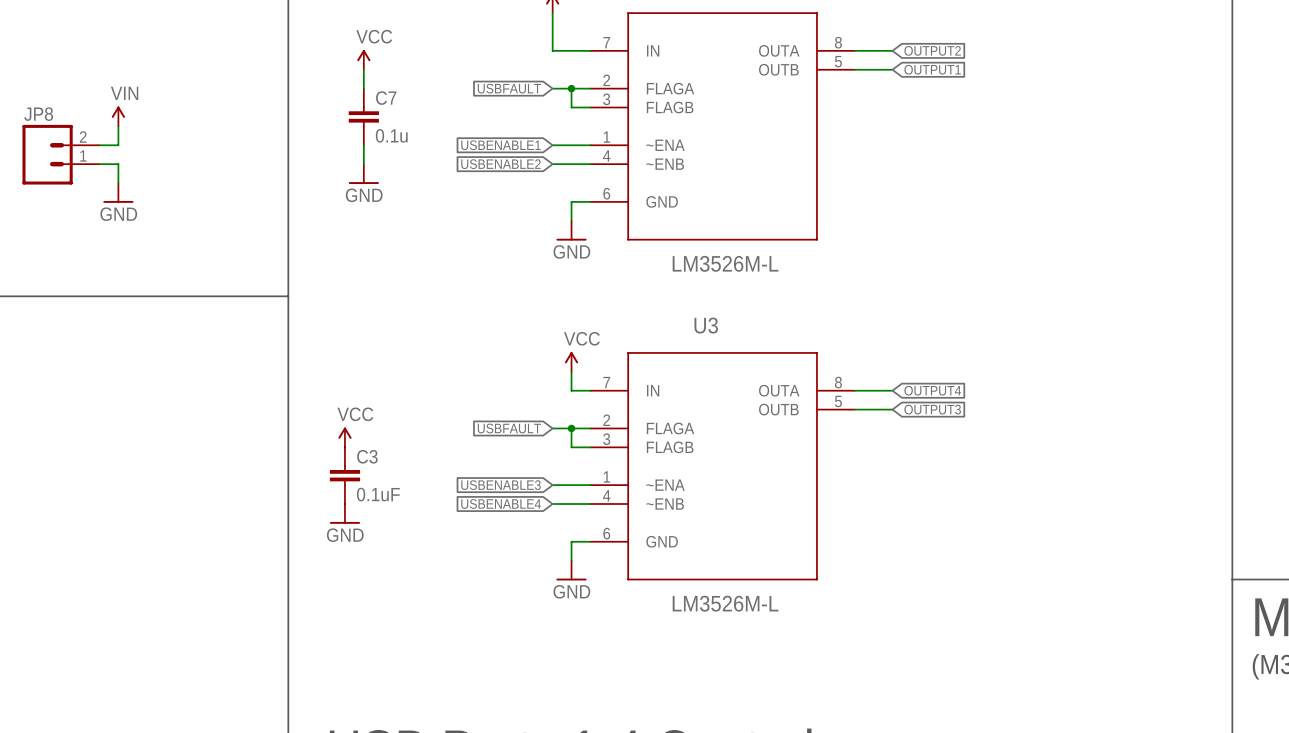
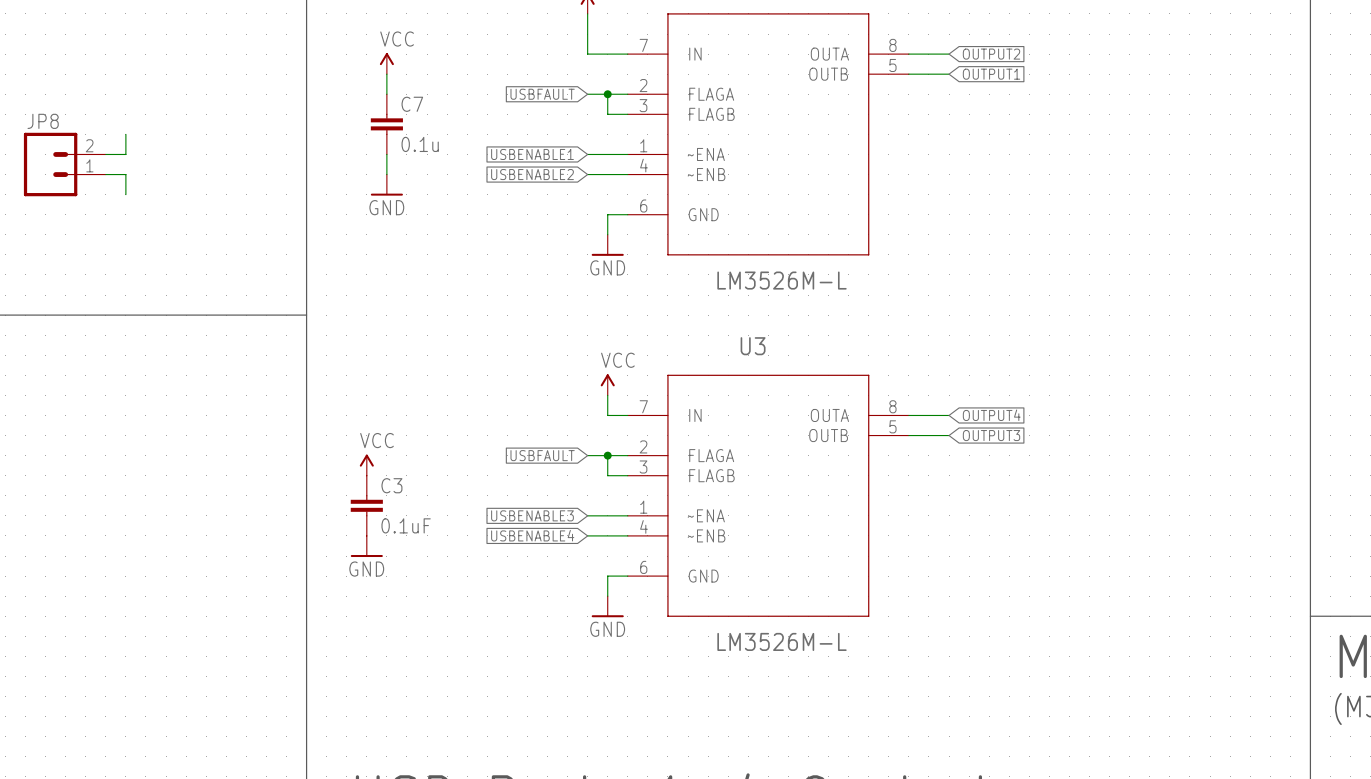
power symbol: VIN (118, 116) -> none
power symbol: GND (118, 192) -> none

